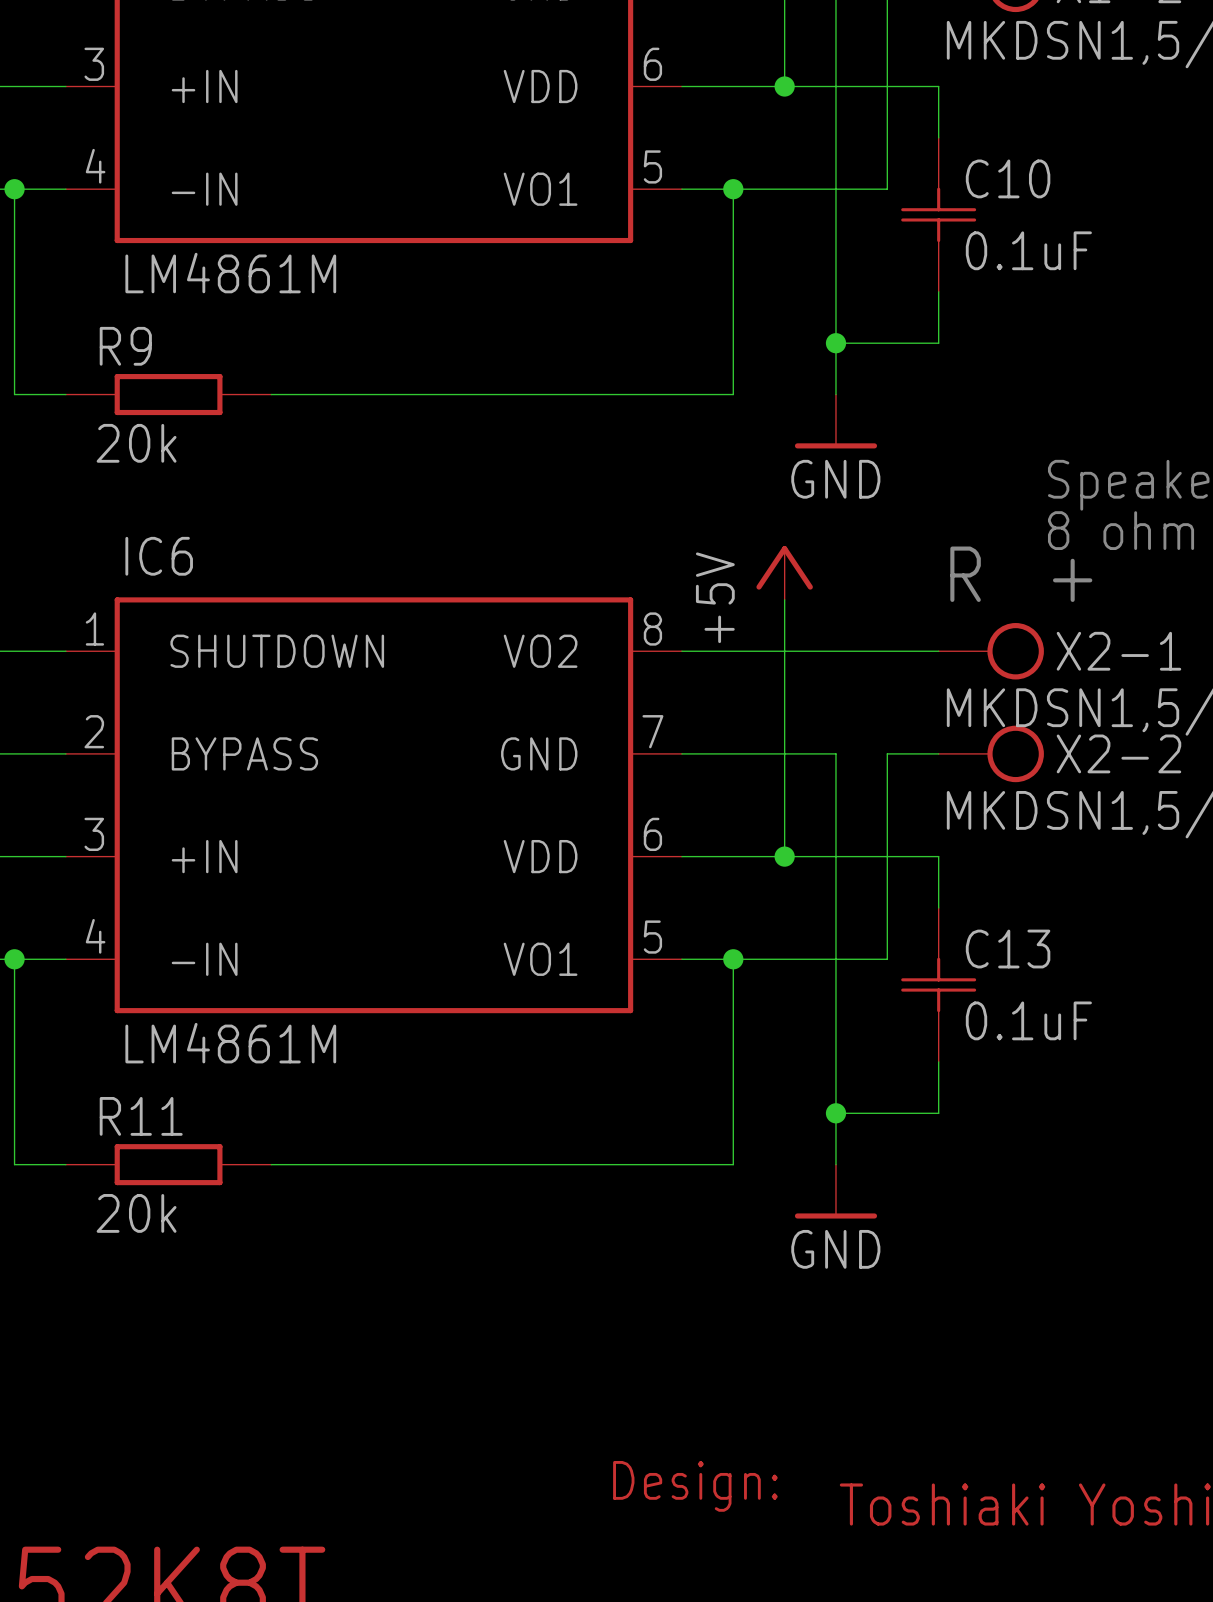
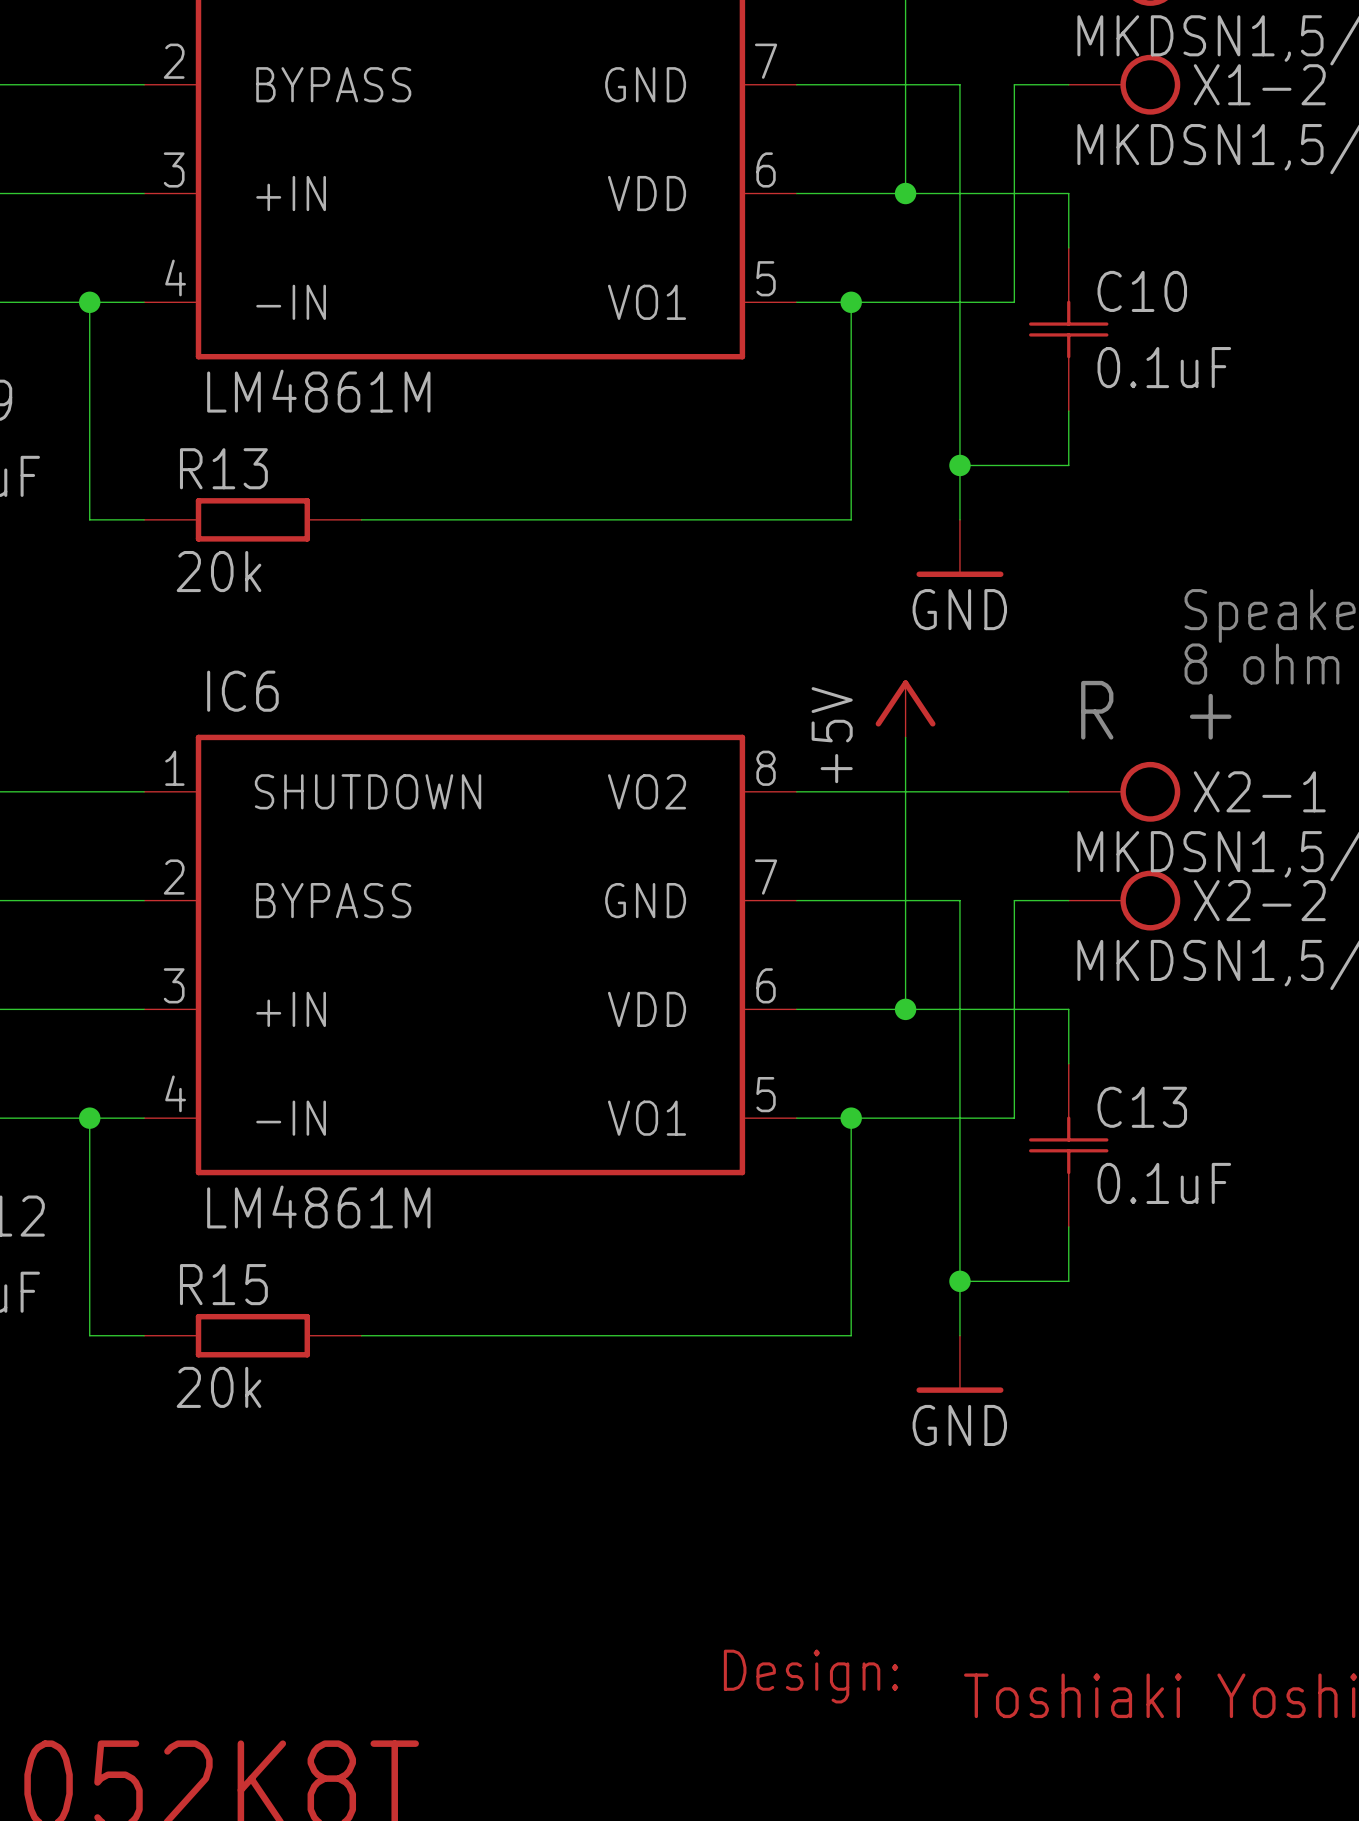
R9 name: R9 (125, 346) -> R13 (223, 468)
R11 name: R11 (141, 1116) -> R15 (223, 1284)

